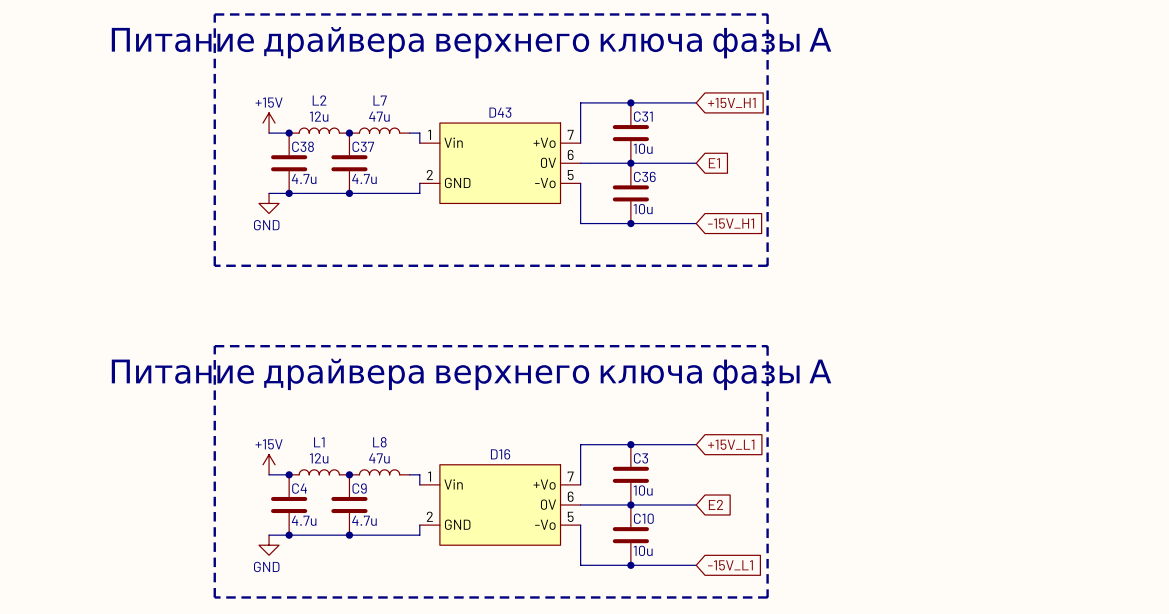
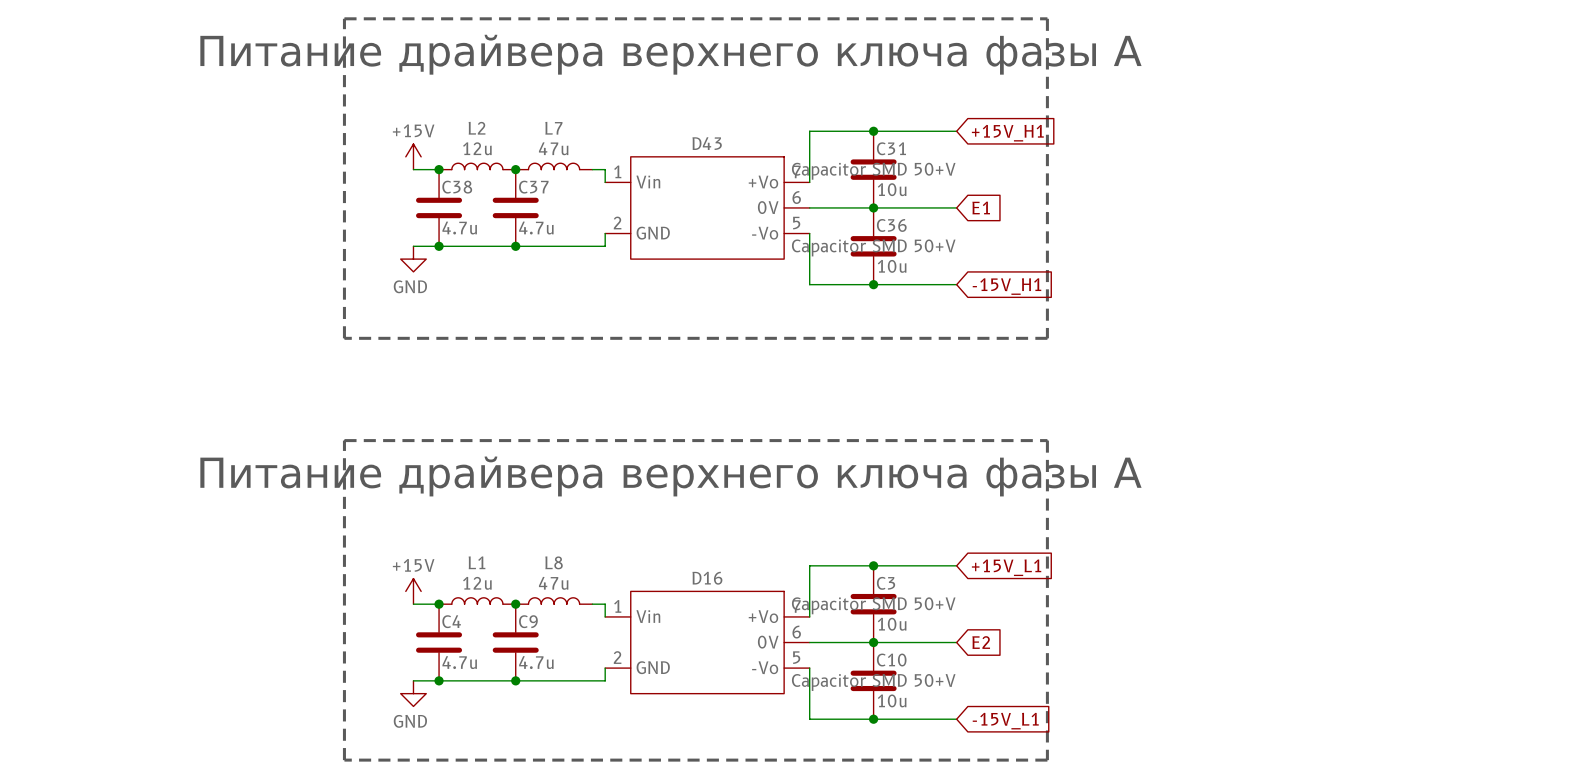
C31 text: none -> Capacitor SMD 50+V (873, 171)
C36 text: none -> Capacitor SMD 50+V (873, 247)
C3 text: none -> Capacitor SMD 50+V (873, 605)
C10 text: none -> Capacitor SMD 50+V (873, 682)

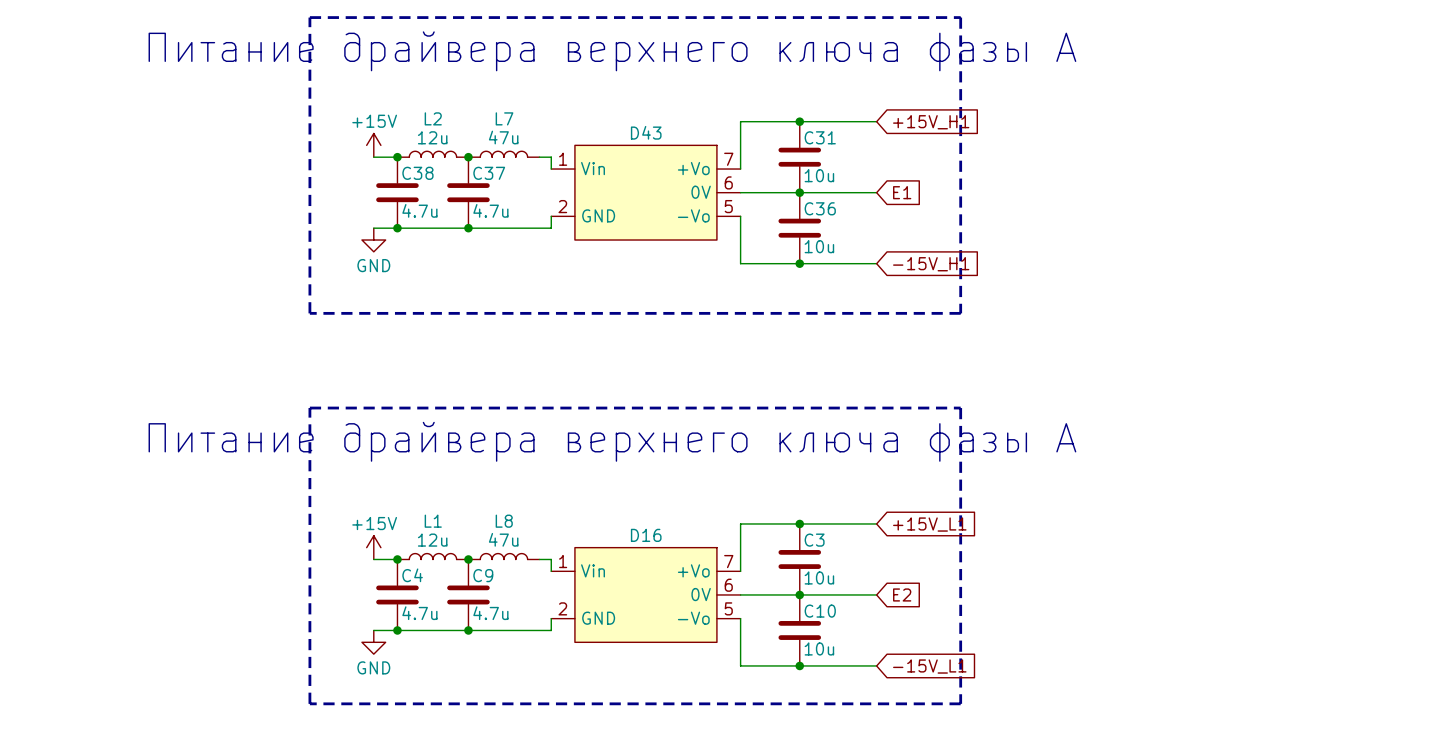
C31 text: Capacitor SMD 50+V (873, 171) -> none
C36 text: Capacitor SMD 50+V (873, 247) -> none
C3 text: Capacitor SMD 50+V (873, 605) -> none
C10 text: Capacitor SMD 50+V (873, 682) -> none

